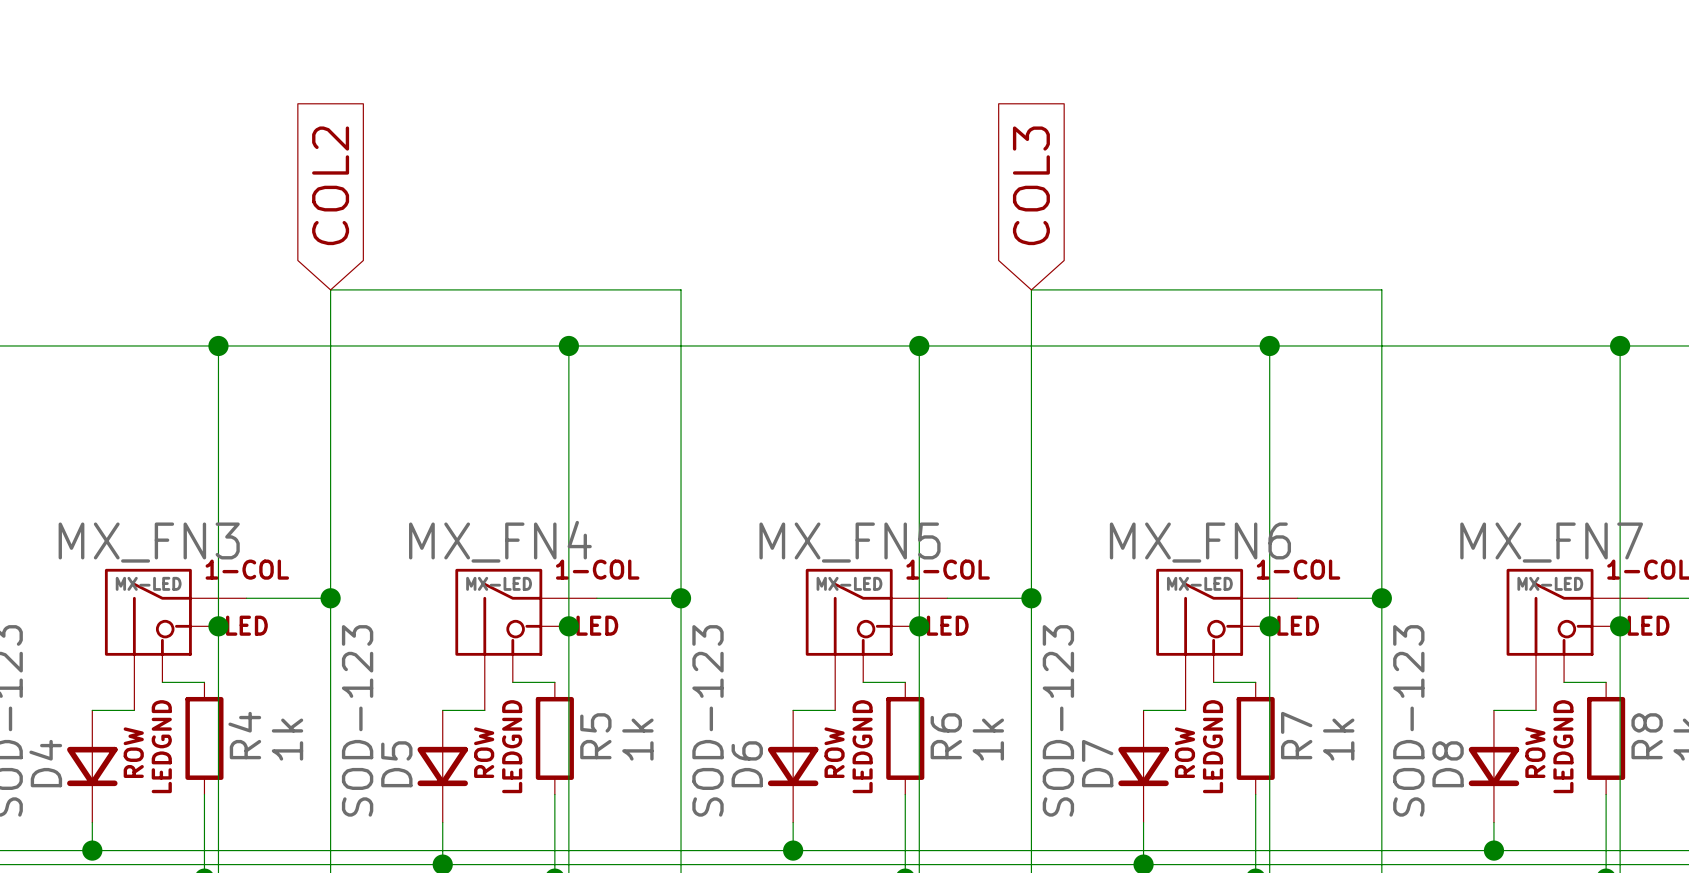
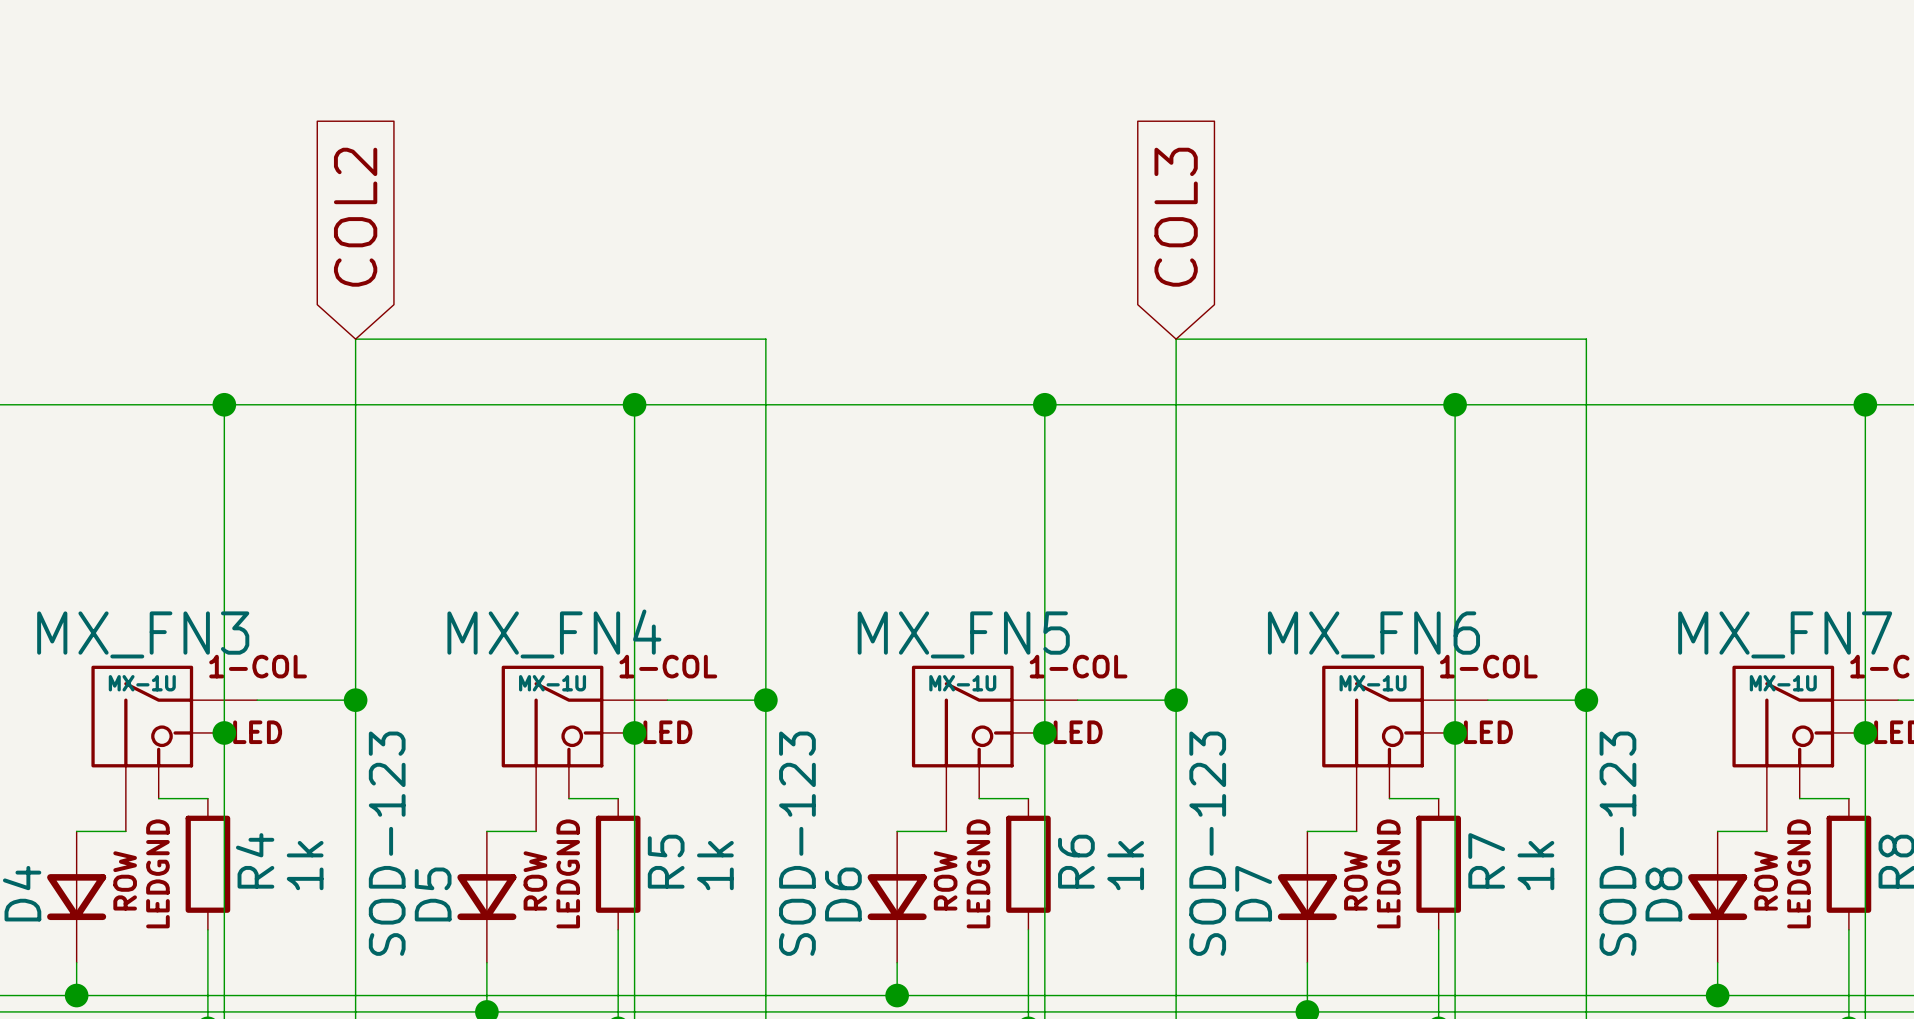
MX_FN3 value: MX-LED (148, 583) -> MX-1U (142, 683)
MX_FN4 value: MX-LED (499, 583) -> MX-1U (552, 683)
MX_FN5 value: MX-LED (849, 583) -> MX-1U (962, 683)
MX_FN6 value: MX-LED (1199, 583) -> MX-1U (1373, 683)
MX_FN7 value: MX-LED (1550, 583) -> MX-1U (1783, 683)

